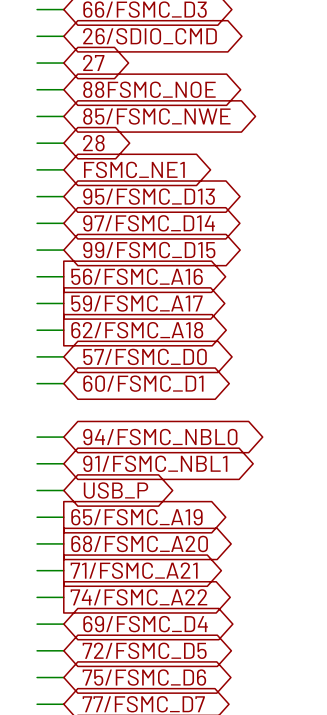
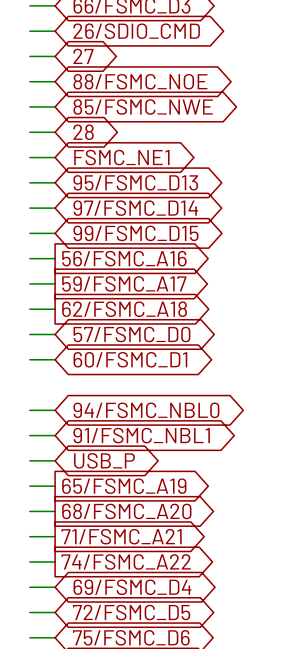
global label: 88FSMC_NOE (149, 89) -> 88/FSMC_NOE (140, 81)

